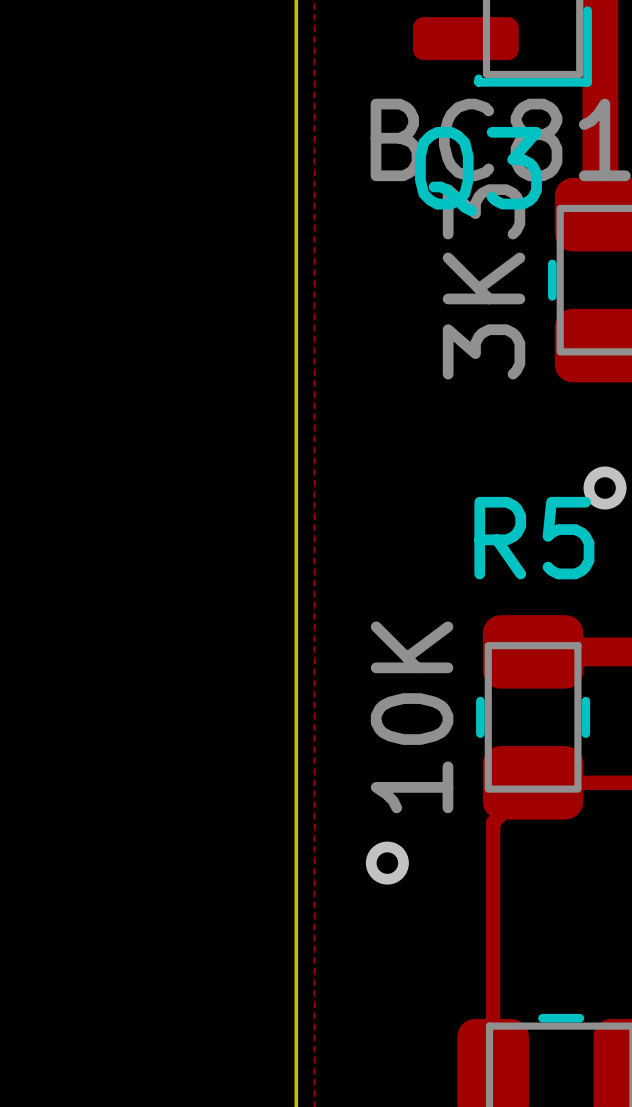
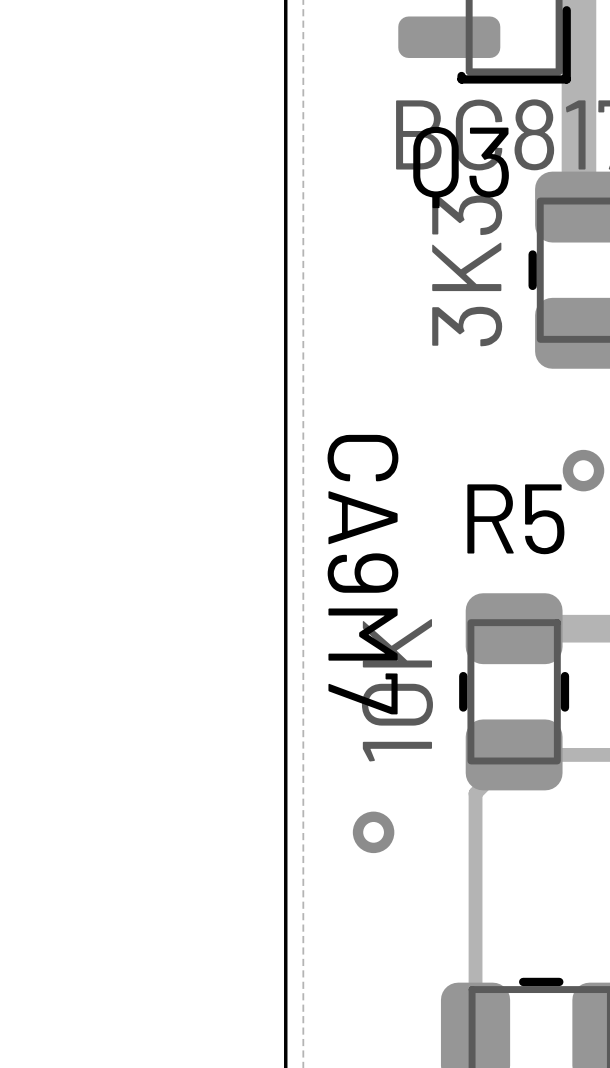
text: none -> CA9M7 (362, 574)

